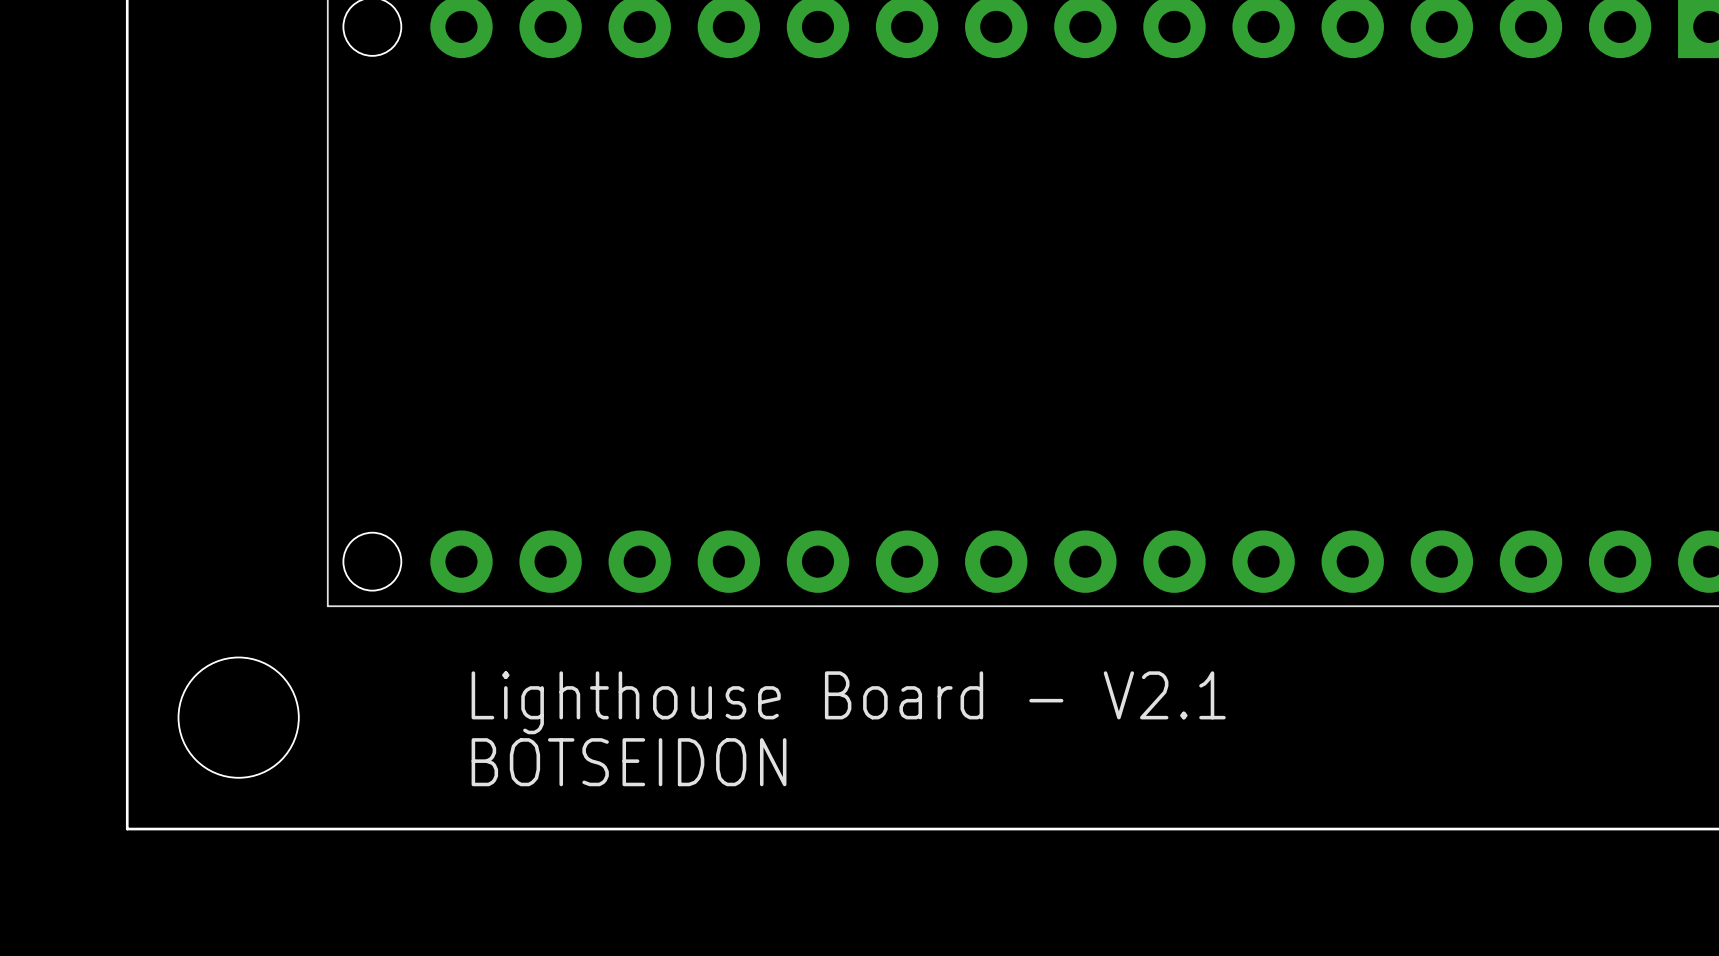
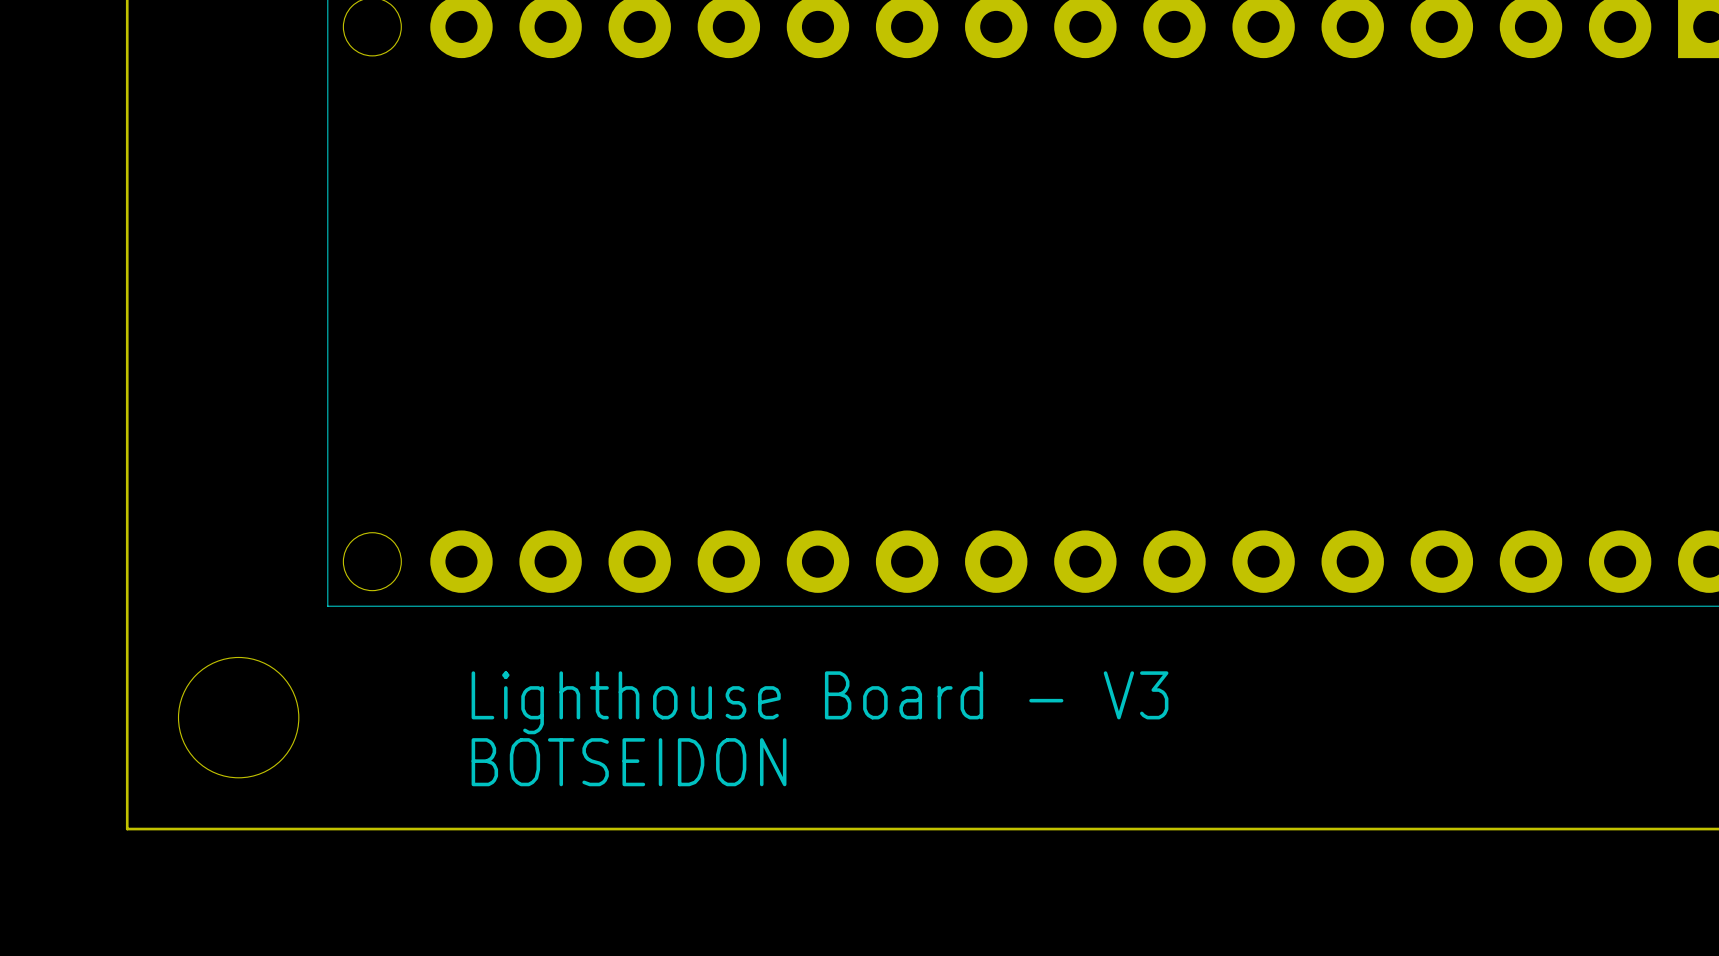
text: Lighthouse Board - V2.1 (848, 702) -> Lighthouse Board - V3 (820, 702)

